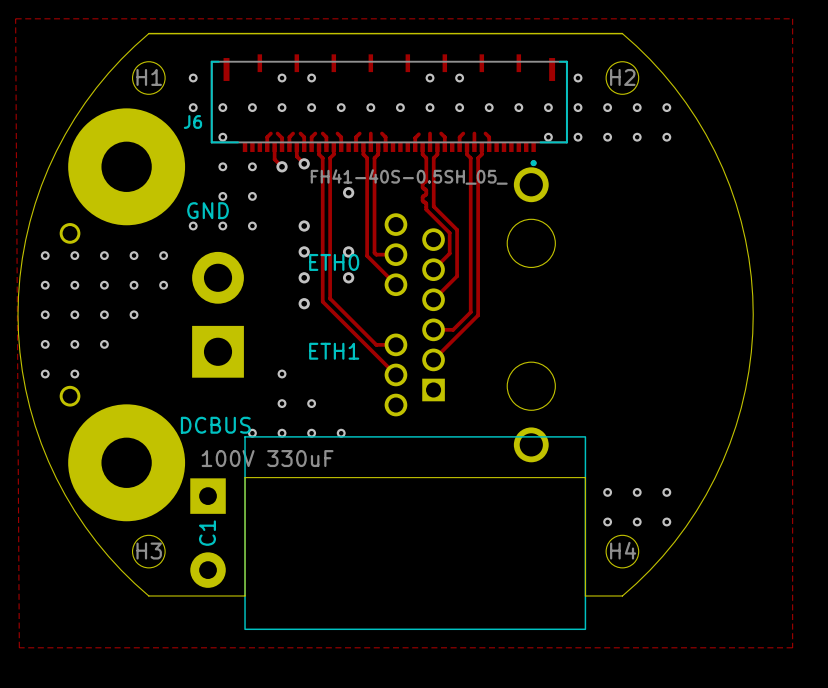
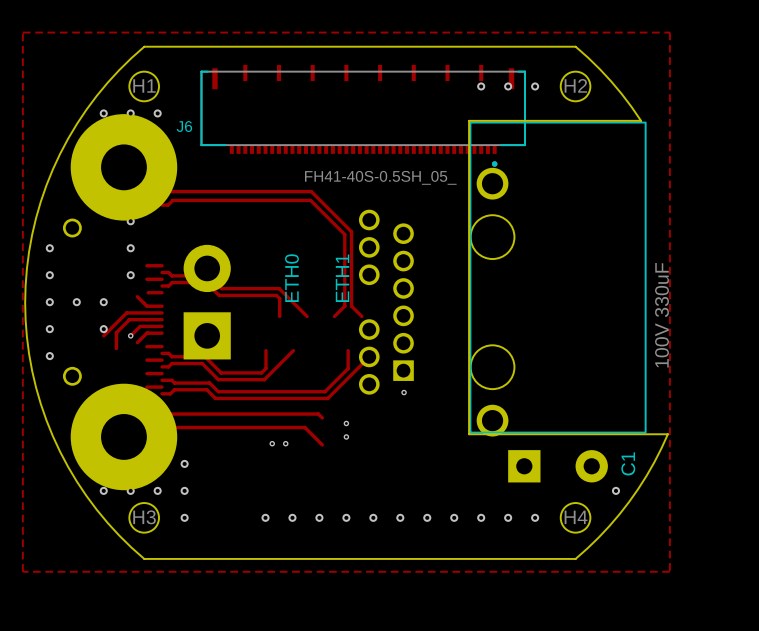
zone outline: (15, 18) (19, 647) (792, 647) (792, 18) (726, 18) -> (22, 32) (22, 571) (669, 571) (669, 32)
board edge: (148, 33) (622, 33) (662, 73) (685, 102) (706, 134) (722, 168) (736, 203) (745, 240) (751, 277) (753, 314) (751, 352) (741, 407) (729, 443) (714, 478) (696, 511) (674, 541) (649, 570) (622, 595) (585, 595) (585, 477) (245, 477) (245, 595) (148, 595) (108, 556) (85, 526) (65, 495) (48, 461) (35, 426) (25, 389) (19, 352) (18, 314) (19, 277) (25, 240) (35, 203) (56, 151) (74, 118) (96, 87) (121, 59) (148, 33) -> (641, 120) (611, 81) (575, 46) (144, 46) (119, 70) (96, 95) (68, 138) (52, 169) (40, 201) (29, 251) (25, 285) (25, 319) (32, 370) (46, 420) (60, 451) (76, 481) (107, 522) (144, 558) (575, 558) (609, 526) (629, 501) (646, 476) (667, 434) (469, 434) (469, 120) (640, 120)
via: (193, 78) -> none
via: (282, 78) -> none
via: (311, 78) -> none
via: (430, 78) -> none
via: (459, 78) -> none
via: none -> (481, 86)
via: none -> (508, 86)
via: none -> (103, 113)
via: none -> (130, 113)
via: none -> (157, 113)
via: (193, 107) -> none
via: (222, 107) -> none
via: (252, 107) -> none
via: (282, 107) -> none
via: (311, 107) -> none
via: (341, 107) -> none
via: (370, 107) -> none
via: (400, 107) -> none
via: (430, 107) -> none
via: (459, 107) -> none
via: (489, 107) -> none
via: (518, 107) -> none
via: (548, 107) -> none
via: (578, 107) -> none
via: (607, 107) -> none
via: (637, 107) -> none
via: (666, 107) -> none
track: (270, 133) (267, 137) (267, 147) -> none
track: (277, 133) (282, 137) (282, 147) -> none
track: (293, 133) (289, 137) (289, 147) -> none
track: (300, 133) (304, 137) (304, 147) -> none
track: (315, 133) (311, 137) (311, 147) -> none
track: (322, 133) (326, 137) (326, 147) -> none
track: (337, 133) (341, 137) (341, 147) -> none
track: (359, 133) (356, 137) (356, 147) -> none
track: (370, 133) (370, 147) -> none
track: (381, 133) (385, 137) (385, 147) -> none
track: (430, 133) (430, 147) -> none
track: (441, 133) (444, 137) (444, 147) -> none
track: (463, 133) (459, 137) (459, 147) -> none
track: (474, 133) (474, 147) -> none
track: (485, 133) (489, 137) (489, 147) -> none
track: (418, 134) (415, 137) (415, 147) -> none
via: (222, 137) -> none
via: (548, 137) -> none
via: (578, 137) -> none
via: (607, 137) -> none
via: (637, 137) -> none
via: (666, 137) -> none
track: (274, 147) (274, 159) (282, 166) -> none
track: (296, 147) (296, 156) (304, 163) -> none
track: (319, 147) (319, 154) (322, 158) (322, 301) (395, 374) -> none
track: (333, 147) (333, 154) (330, 158) (330, 298) (376, 344) (395, 344) -> none
track: (363, 147) (363, 154) (367, 158) (367, 255) (395, 284) -> none
track: (378, 147) (378, 154) (374, 158) (374, 252) (376, 254) (395, 254) -> none
track: (422, 147) (422, 154) (426, 158) (426, 180) (422, 184) (426, 193) (422, 196) (422, 200) (426, 203) (426, 209) (449, 232) (449, 253) (433, 269) -> none
track: (437, 147) (437, 154) (433, 158) (433, 206) (457, 229) (457, 276) (433, 299) -> none
track: (467, 147) (467, 154) (470, 158) (470, 312) (453, 329) (433, 329) -> none
track: (481, 147) (481, 154) (478, 158) (478, 315) (433, 359) -> none
via: (304, 163) -> none
via: (222, 166) -> none
via: (252, 166) -> none
via: (282, 166) -> none
via: (348, 192) -> none
track: none -> (162, 191) (311, 191) (351, 231) (351, 306) (361, 316)
via: (222, 196) -> none
via: (252, 196) -> none
track: none -> (162, 205) (168, 205) (172, 200) (310, 200) (344, 234) (344, 306) (334, 316)
text: GND (208, 210) -> none
via: none -> (130, 221)
via: (193, 226) -> none
via: (222, 226) -> none
via: (252, 226) -> none
via: (304, 226) -> none
via: (304, 251) -> none
via: (348, 251) -> none
via: (74, 255) -> none
via: (104, 255) -> none
via: (163, 255) -> none
text rotation: 0° (334, 262) -> 90° counterclockwise (291, 278)
track: none -> (146, 265) (162, 265)
via: (304, 277) -> none
via: (348, 277) -> none
track: none -> (162, 272) (168, 272) (171, 275) (209, 275) (221, 288) (279, 288) (307, 316)
via: (74, 285) -> none
via: (104, 285) -> none
via: (163, 285) -> none
track: none -> (146, 279) (162, 279)
track: none -> (162, 285) (168, 285) (171, 282) (206, 282) (219, 295) (276, 295) (279, 298) (279, 316)
via: (304, 303) -> none
track: none -> (148, 292) (162, 292)
track: none -> (137, 296) (146, 306) (162, 306)
via: (134, 314) -> none
track: none -> (162, 312) (126, 312) (103, 335)
track: none -> (162, 319) (129, 319) (116, 332) (116, 348)
track: none -> (162, 326) (140, 326) (130, 335)
via: (74, 344) -> none
track: none -> (162, 333) (146, 333) (137, 342)
via: none -> (130, 335)
text rotation: 0° (334, 351) -> 90° counterclockwise (342, 278)
text position: ETH1 (334, 351) -> ETH1 (342, 278)
track: none -> (146, 346) (162, 346)
track: none -> (265, 350) (265, 368) (261, 372) (221, 372) (204, 356) (171, 356) (168, 353) (162, 353)
track: none -> (293, 350) (264, 379) (218, 379) (202, 363) (171, 363) (168, 366) (162, 366)
track: none -> (348, 350) (348, 368) (325, 391) (218, 391) (209, 383) (174, 383) (171, 380) (162, 380)
track: none -> (375, 350) (327, 398) (215, 398) (206, 389) (174, 389) (170, 393) (162, 393)
via: (74, 374) -> none
via: (282, 374) -> none
track: none -> (146, 360) (162, 360)
track: none -> (146, 373) (162, 373)
via: (282, 403) -> none
via: (311, 403) -> none
track: none -> (146, 387) (162, 387)
via: none -> (404, 392)
text: DCBUS (215, 425) -> none
via: (252, 433) -> none
via: (282, 433) -> none
via: (311, 433) -> none
via: (341, 433) -> none
track: none -> (162, 414) (318, 414) (322, 417)
via: none -> (346, 423)
track: none -> (162, 427) (304, 427) (322, 444)
C1 value position: 100V 330uF (267, 458) -> 100V 330uF (661, 315)
via: none -> (346, 436)
via: none -> (272, 443)
via: none -> (285, 443)
via: none -> (184, 463)
via: (607, 492) -> none
via: (637, 492) -> none
via: (666, 492) -> none
via: none -> (103, 490)
via: none -> (130, 490)
via: none -> (157, 490)
via: none -> (184, 490)
via: (607, 522) -> none
via: (637, 522) -> none
C1 name position: C1 (207, 533) -> C1 (628, 463)
C1 rotation: 0° (388, 533) -> 90° counterclockwise (558, 302)
C1 position: (388, 533) -> (558, 302)
via: none -> (184, 517)
via: none -> (265, 517)
via: none -> (292, 517)
via: none -> (319, 517)
via: none -> (346, 517)
via: none -> (373, 517)
via: none -> (400, 517)
via: none -> (427, 517)
via: none -> (454, 517)
via: none -> (481, 517)
via: none -> (508, 517)
via: none -> (535, 517)

